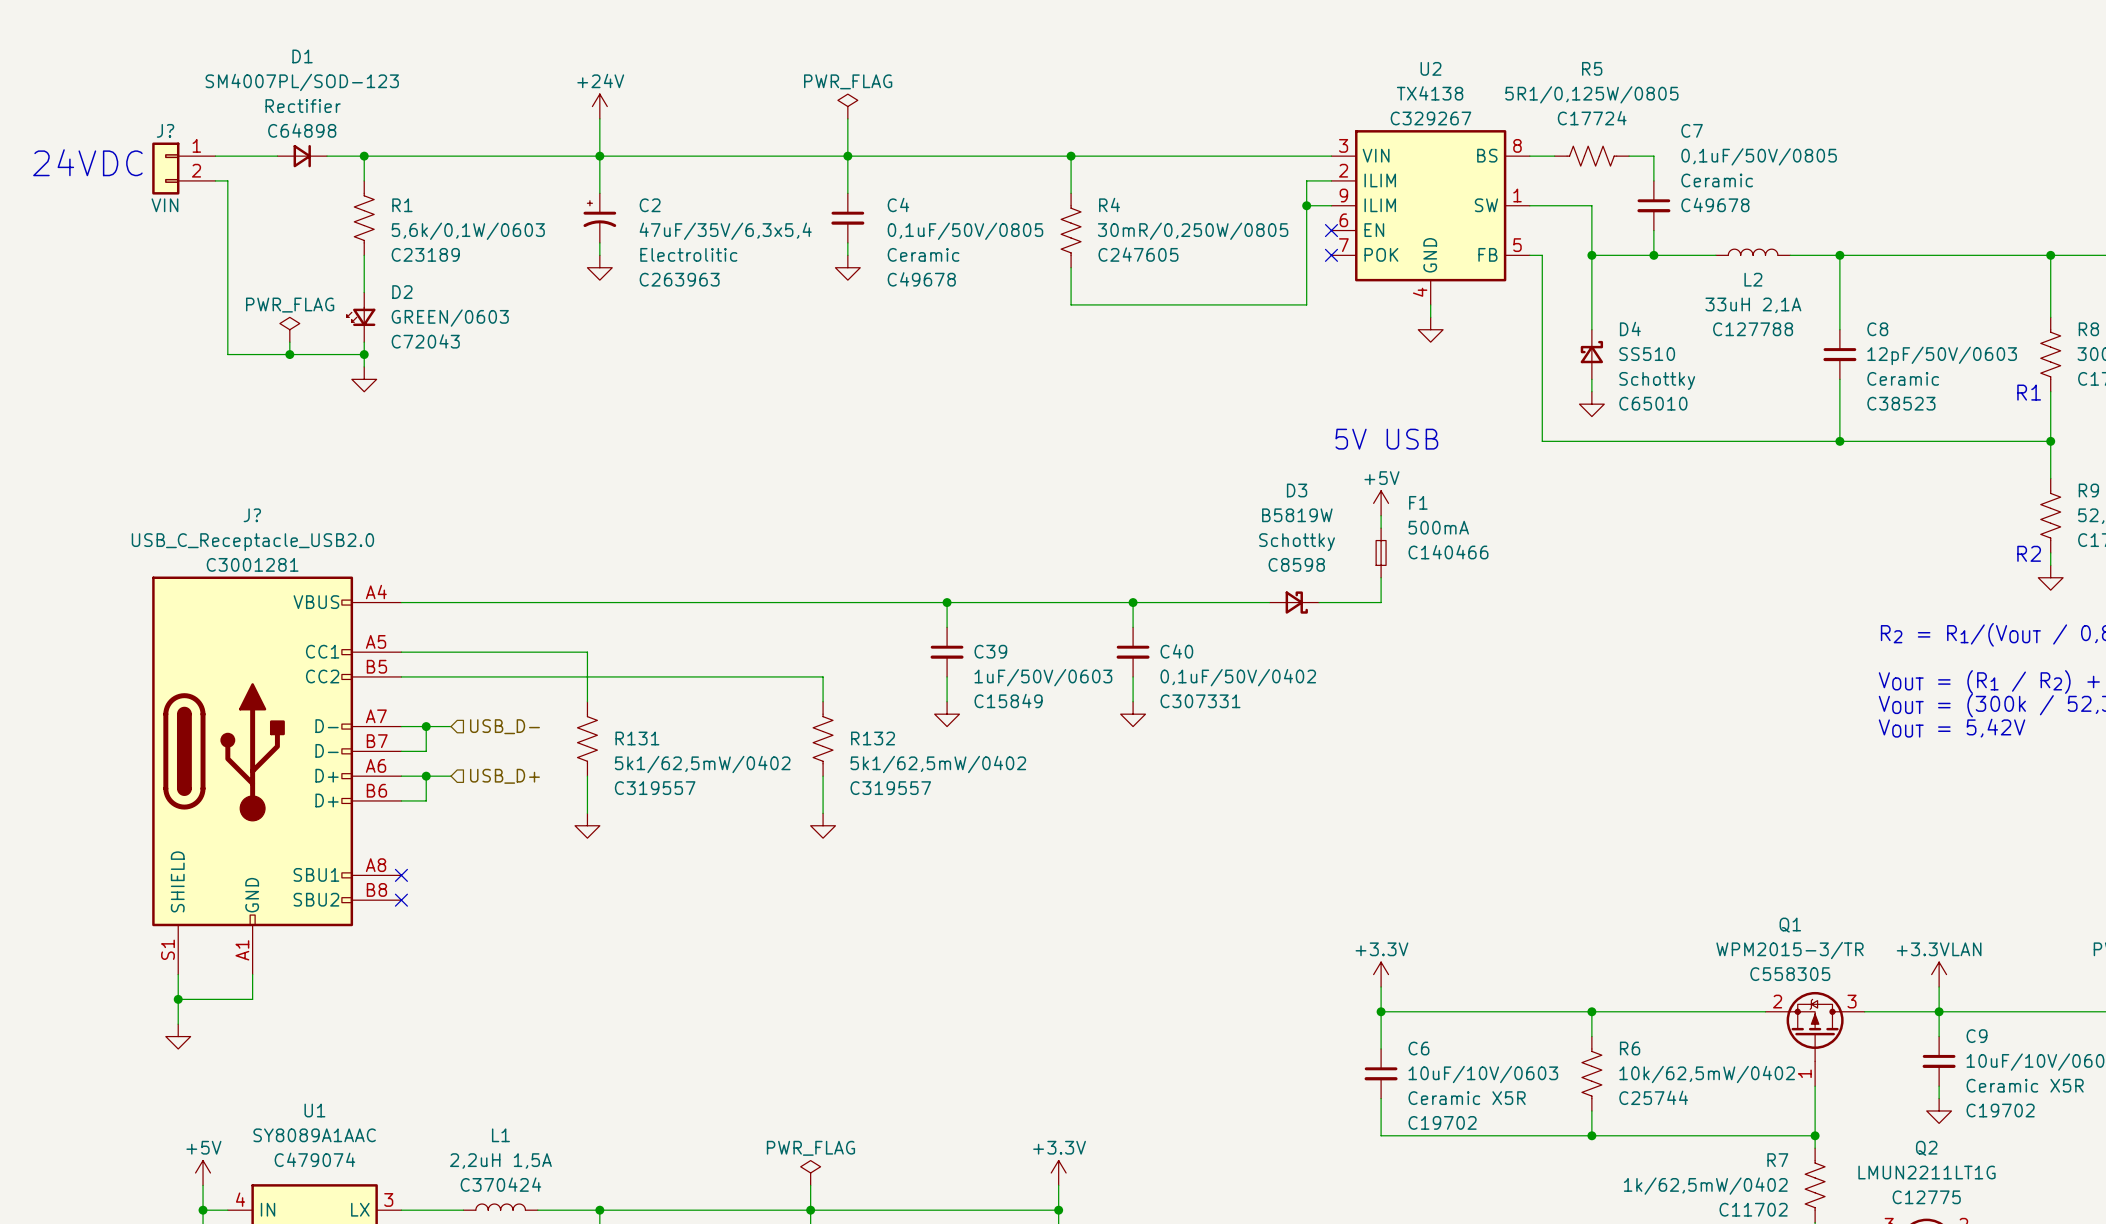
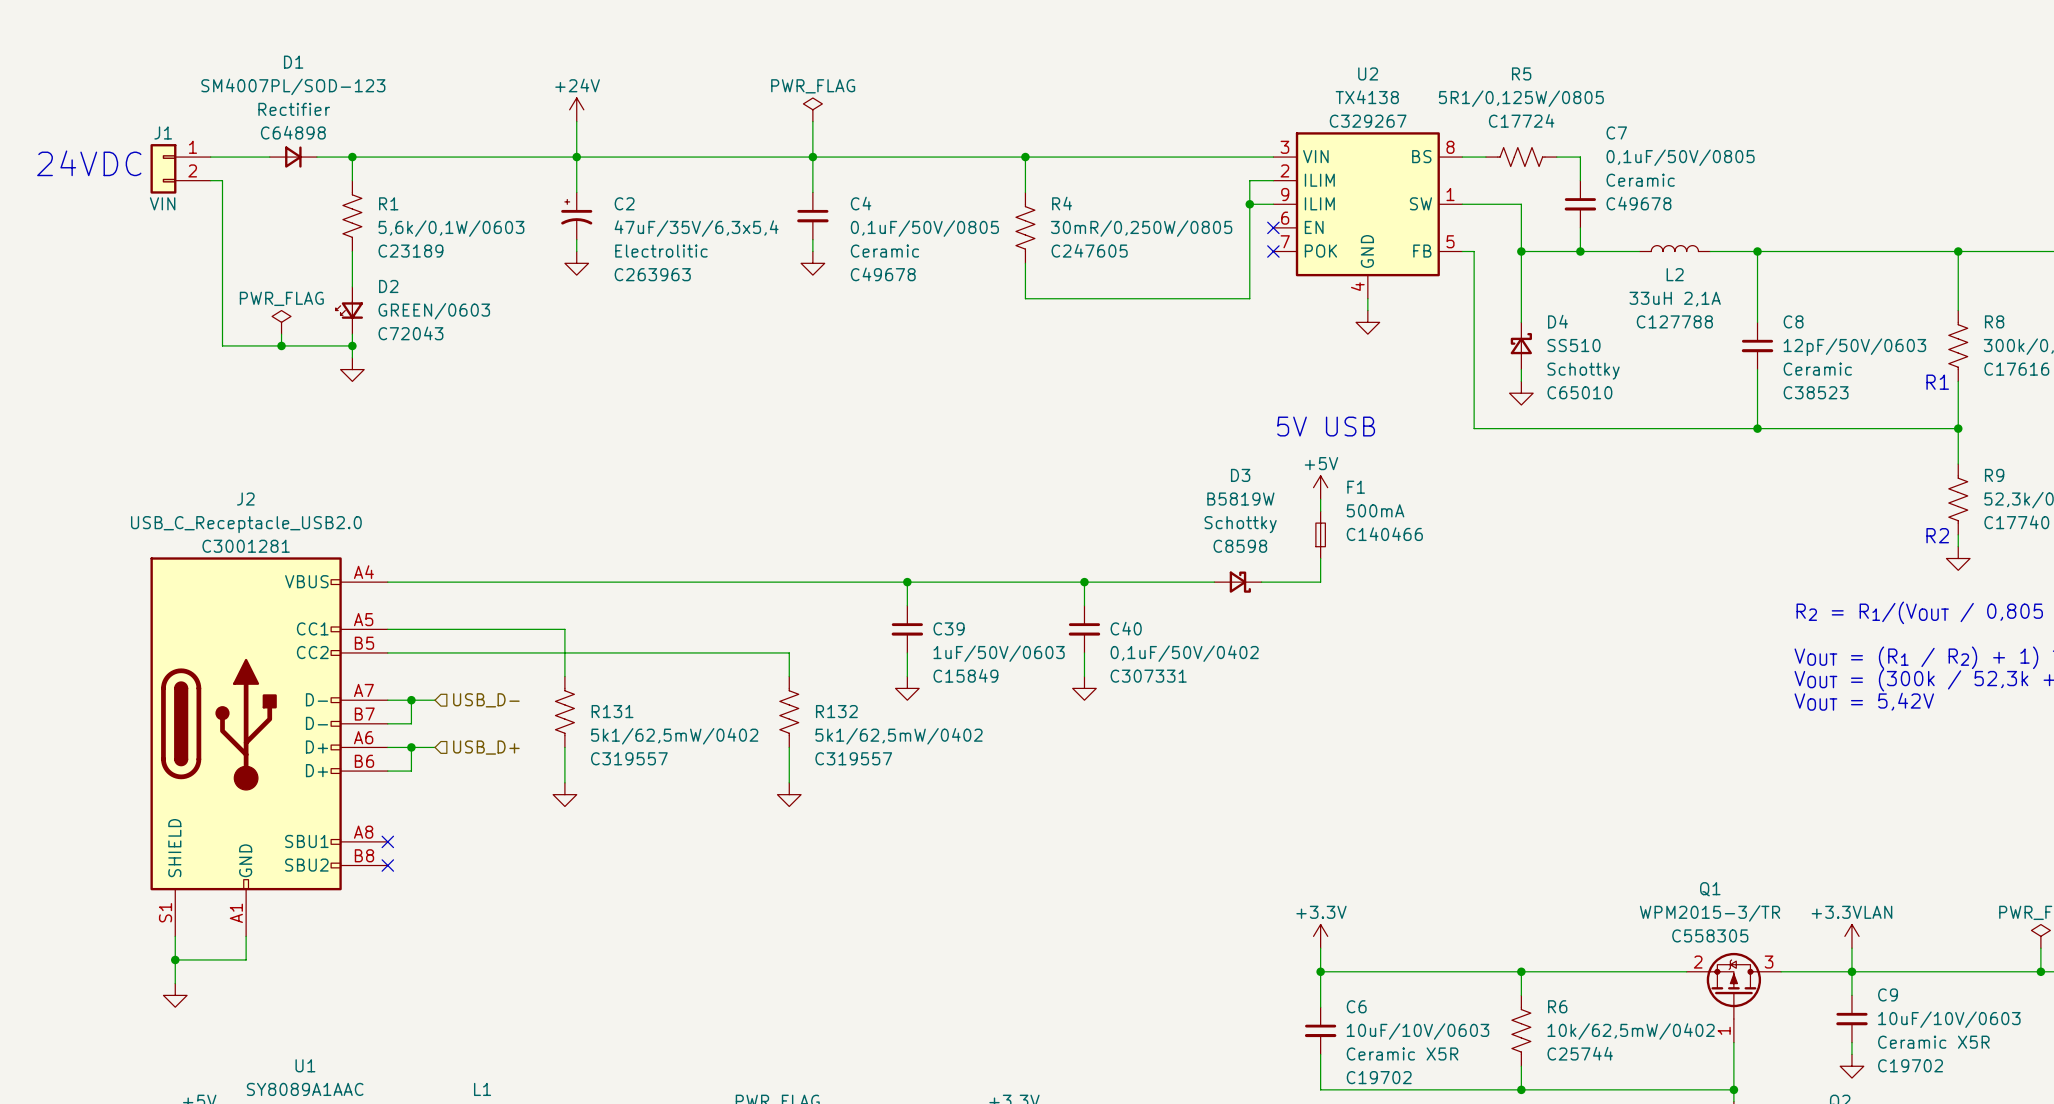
J? name: J? (165, 130) -> J1 (163, 132)
J? name: J? (252, 515) -> J2 (245, 499)

